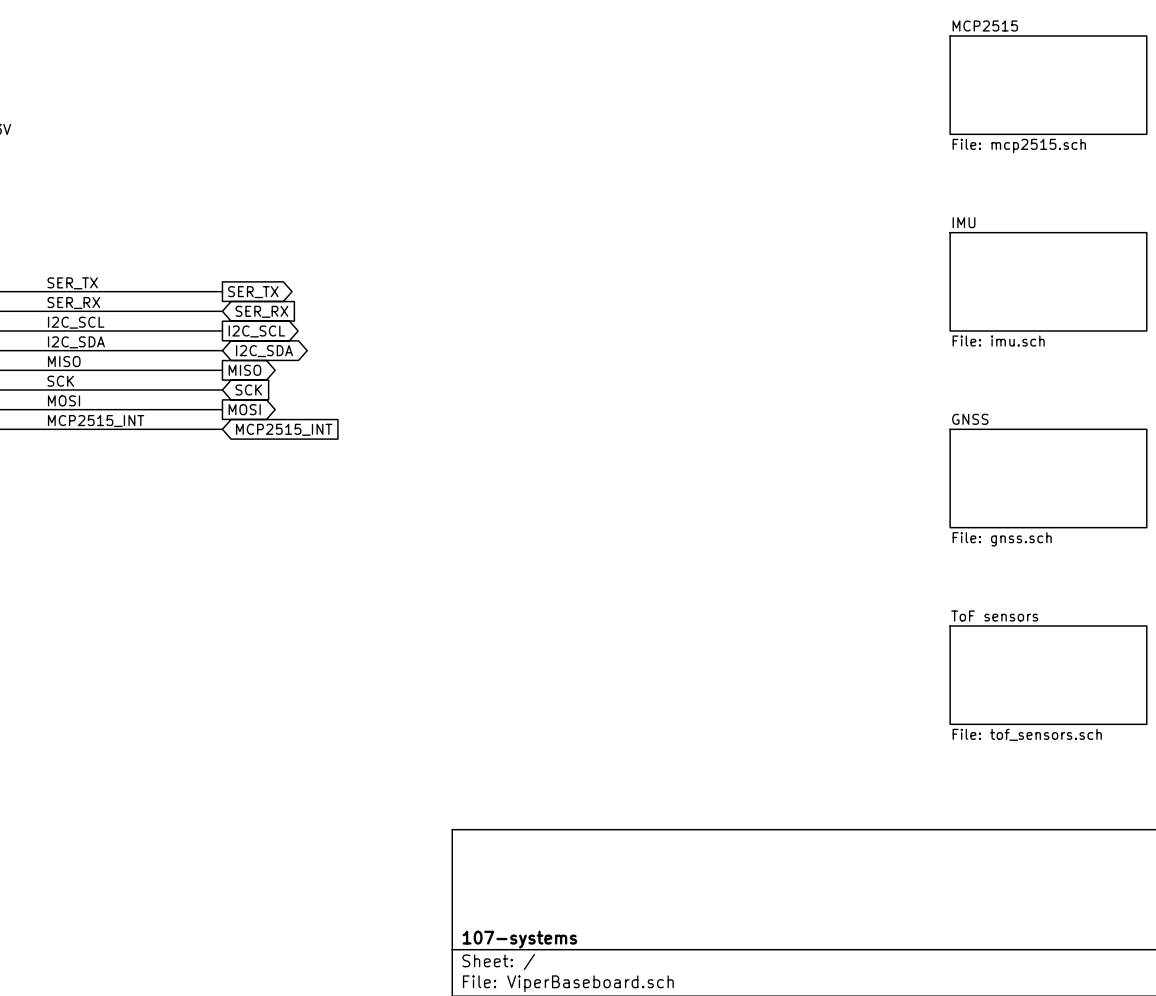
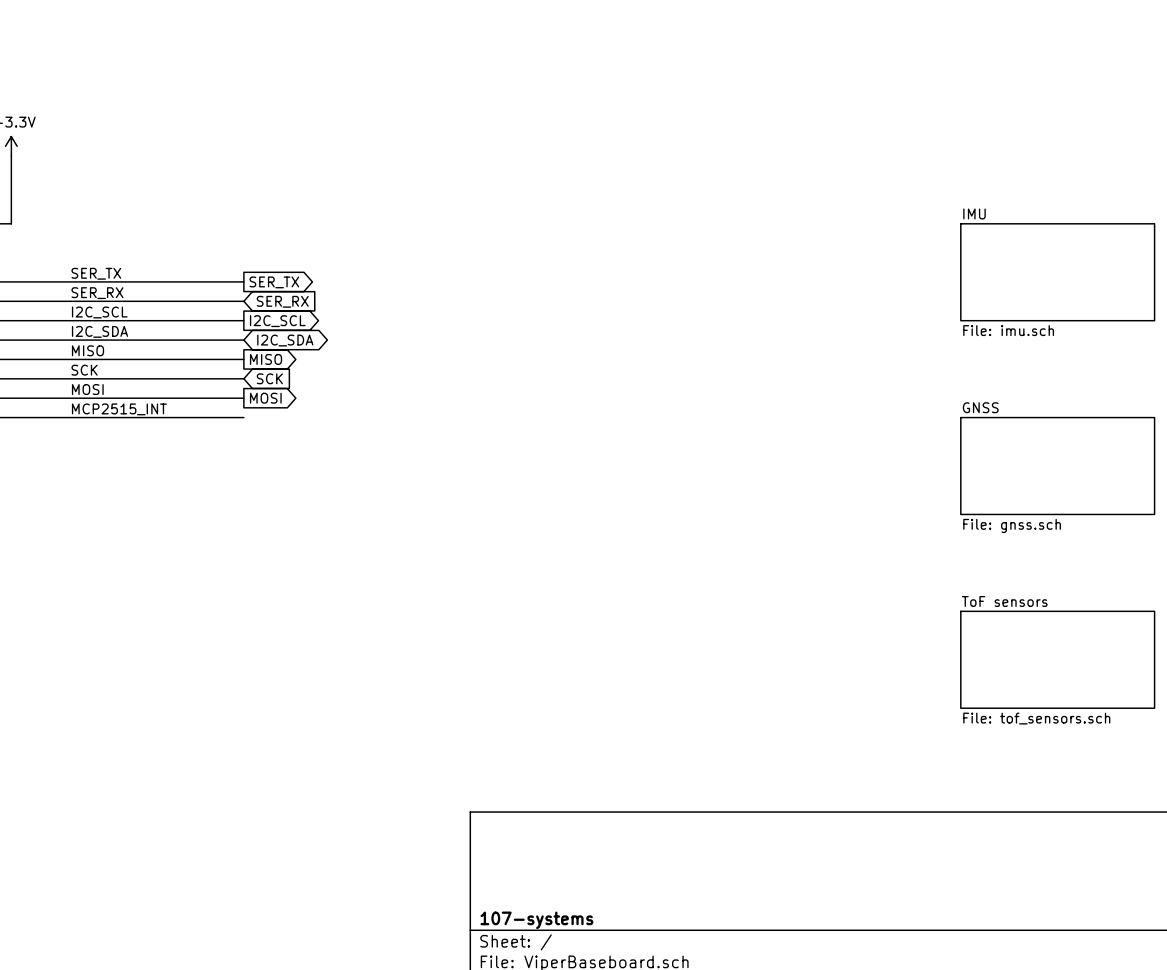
sheet MCP2515: File: mcp2515.sch (1048, 85) -> none
global label: MCP2515_INT (284, 429) -> none

